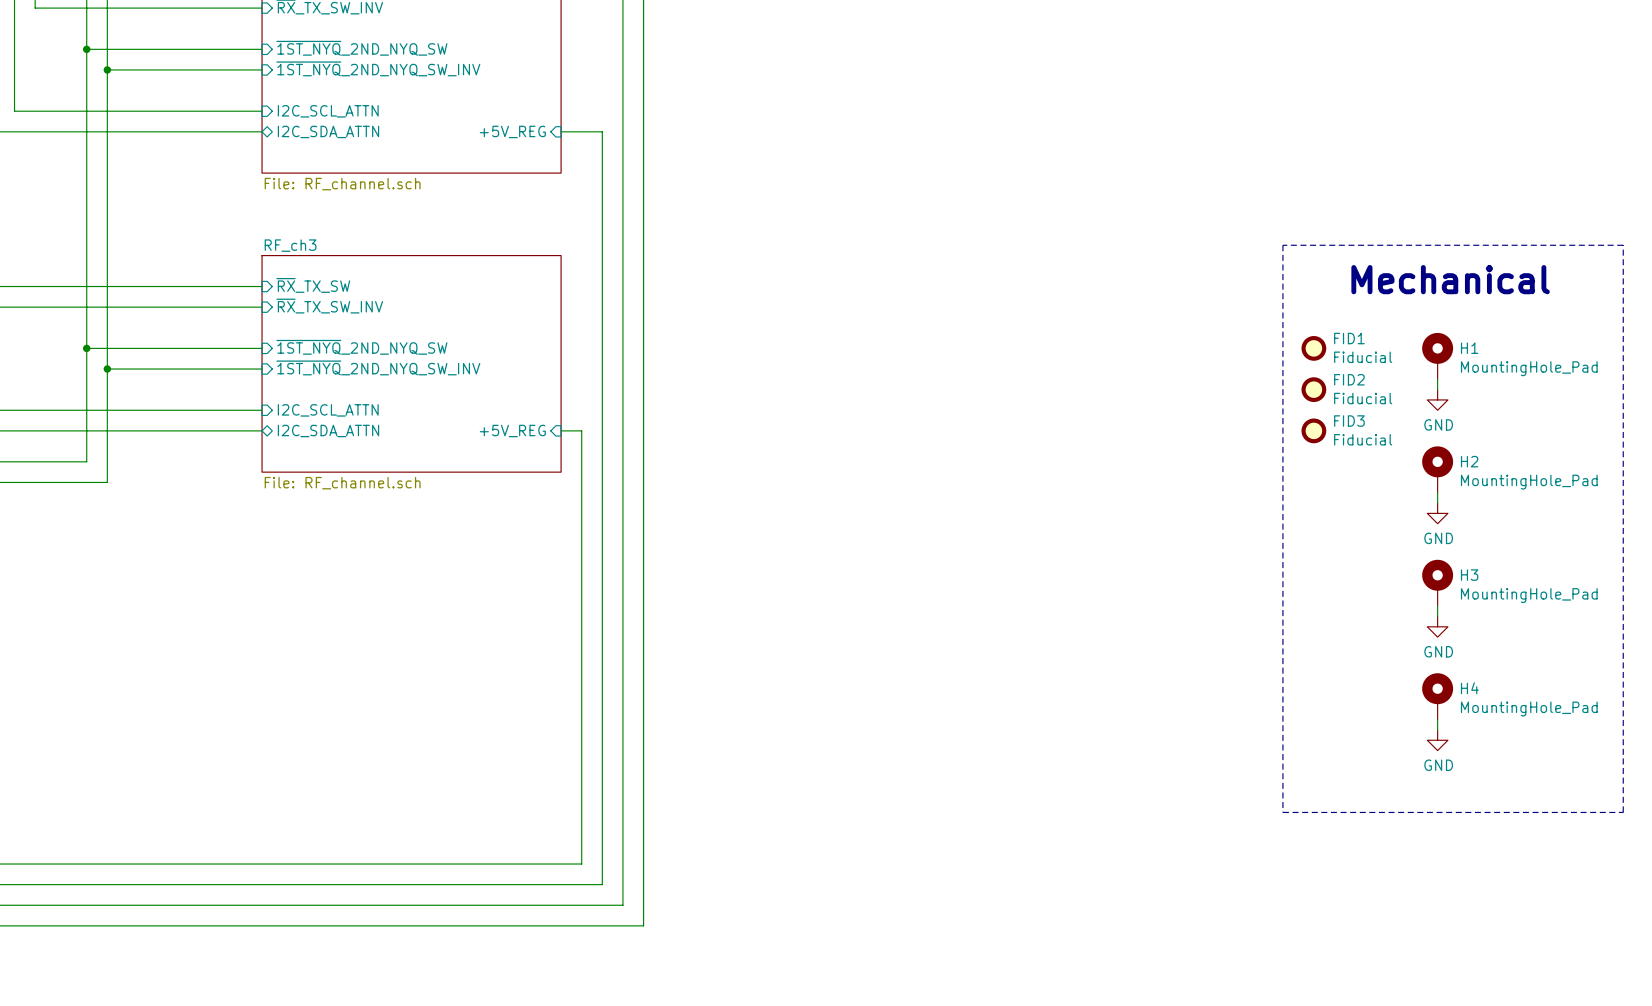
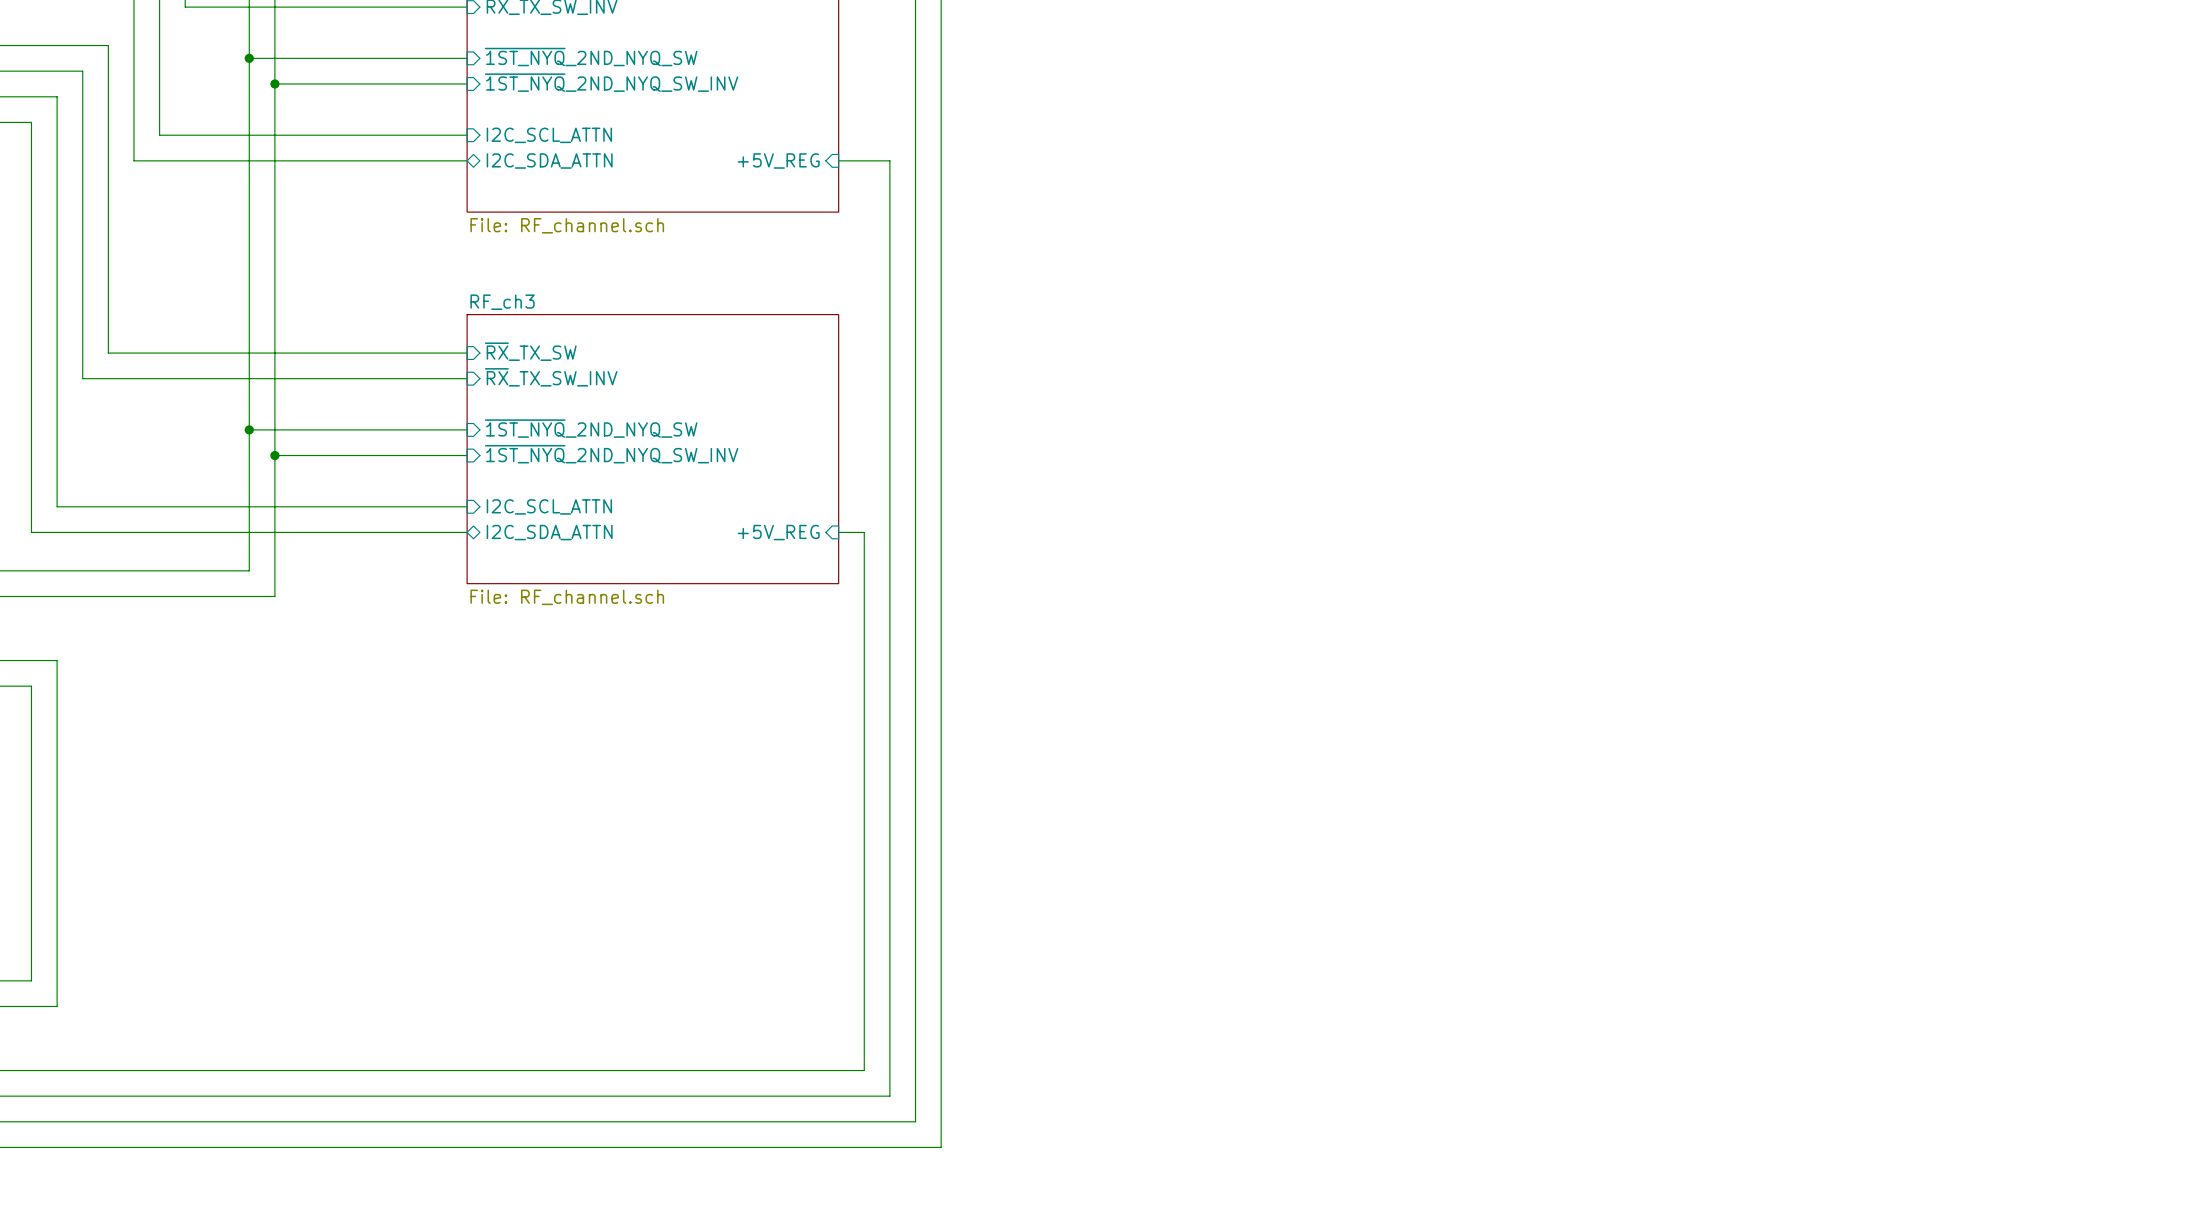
line: (1282, 245) (1282, 812) (1623, 812) (1623, 245) (1282, 245) -> none
text: Mechanical (1450, 279) -> none
FID1: Fiducial (1313, 348) -> none
H1: MountingHole_Pad (1437, 356) -> none
wire: (1437, 379) (1437, 389) -> none
FID2: Fiducial (1313, 389) -> none
power symbol: GND (1437, 399) -> none
FID3: Fiducial (1313, 430) -> none
H2: MountingHole_Pad (1437, 469) -> none
wire: (1437, 492) (1437, 503) -> none
power symbol: GND (1437, 513) -> none
H3: MountingHole_Pad (1437, 583) -> none
wire: (1437, 606) (1437, 616) -> none
power symbol: GND (1437, 626) -> none
H4: MountingHole_Pad (1437, 696) -> none
wire: (1437, 719) (1437, 729) -> none
power symbol: GND (1437, 740) -> none

